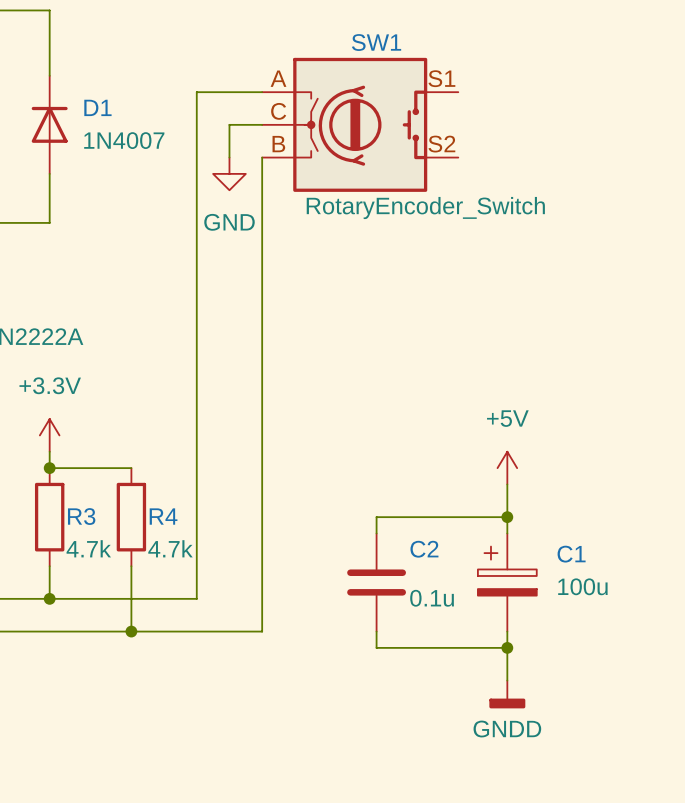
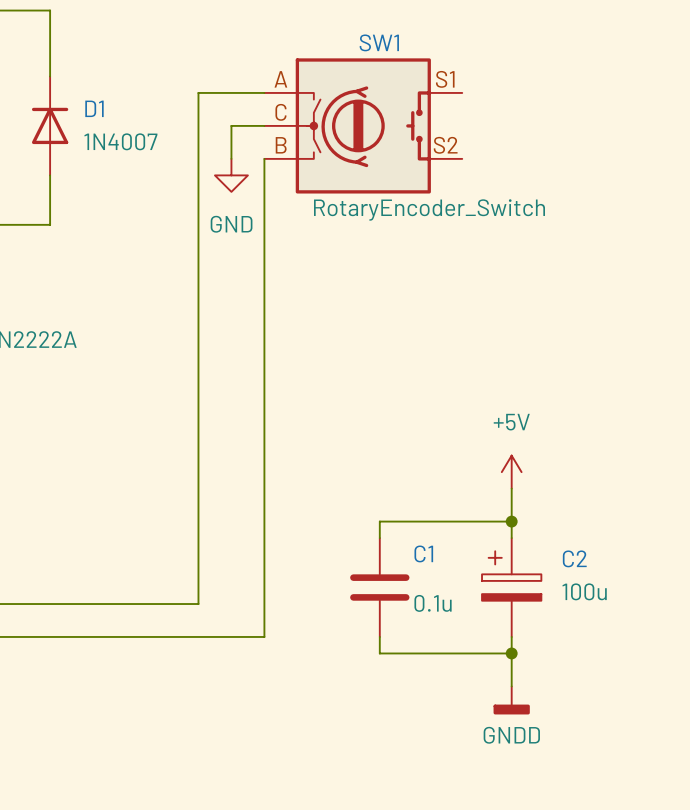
power symbol: +3.3V (49, 435) -> none
wire: (49, 451) (49, 468) (131, 468) -> none
junction: (49, 468) -> none
R3: 4.7k (49, 517) -> none
R4: 4.7k (131, 517) -> none
C2 name: C2 (424, 549) -> C1 (423, 553)
C1 name: C1 (571, 554) -> C2 (574, 558)
wire: (49, 566) (49, 598) -> none
wire: (131, 566) (131, 631) -> none
junction: (49, 598) -> none
junction: (131, 631) -> none

